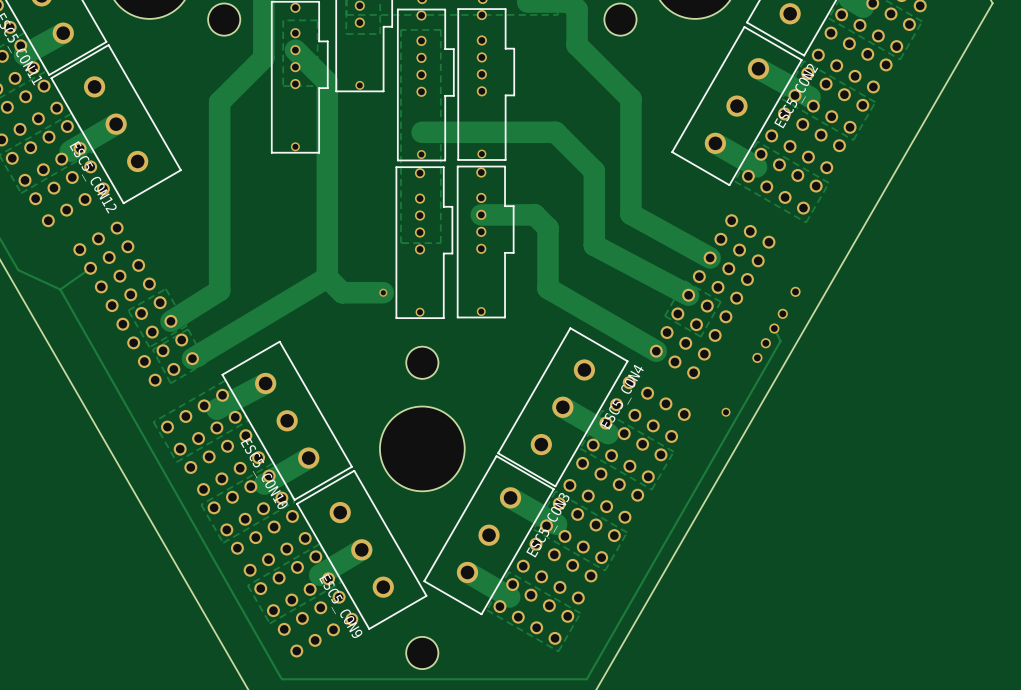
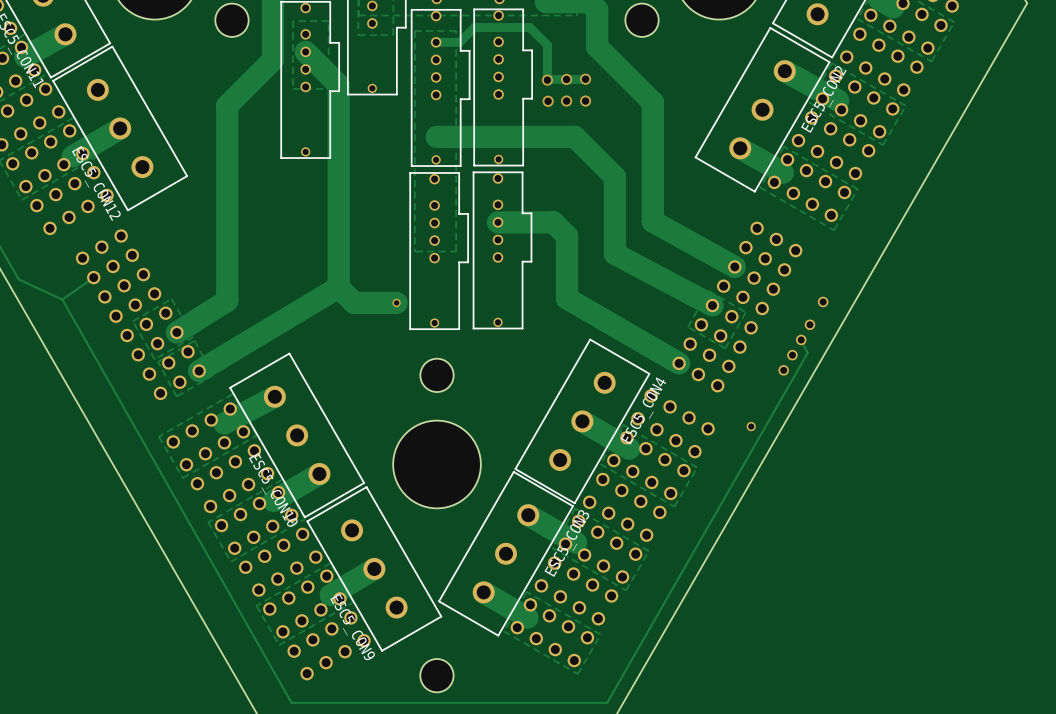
track: none -> (436, 42) (459, 42) (474, 27) (529, 27) (547, 45) (547, 80) (585, 79)
via: none -> (566, 79)
via: none -> (585, 79)
via: none -> (547, 80)
via: none -> (548, 101)
via: none -> (566, 101)
via: none -> (585, 101)

